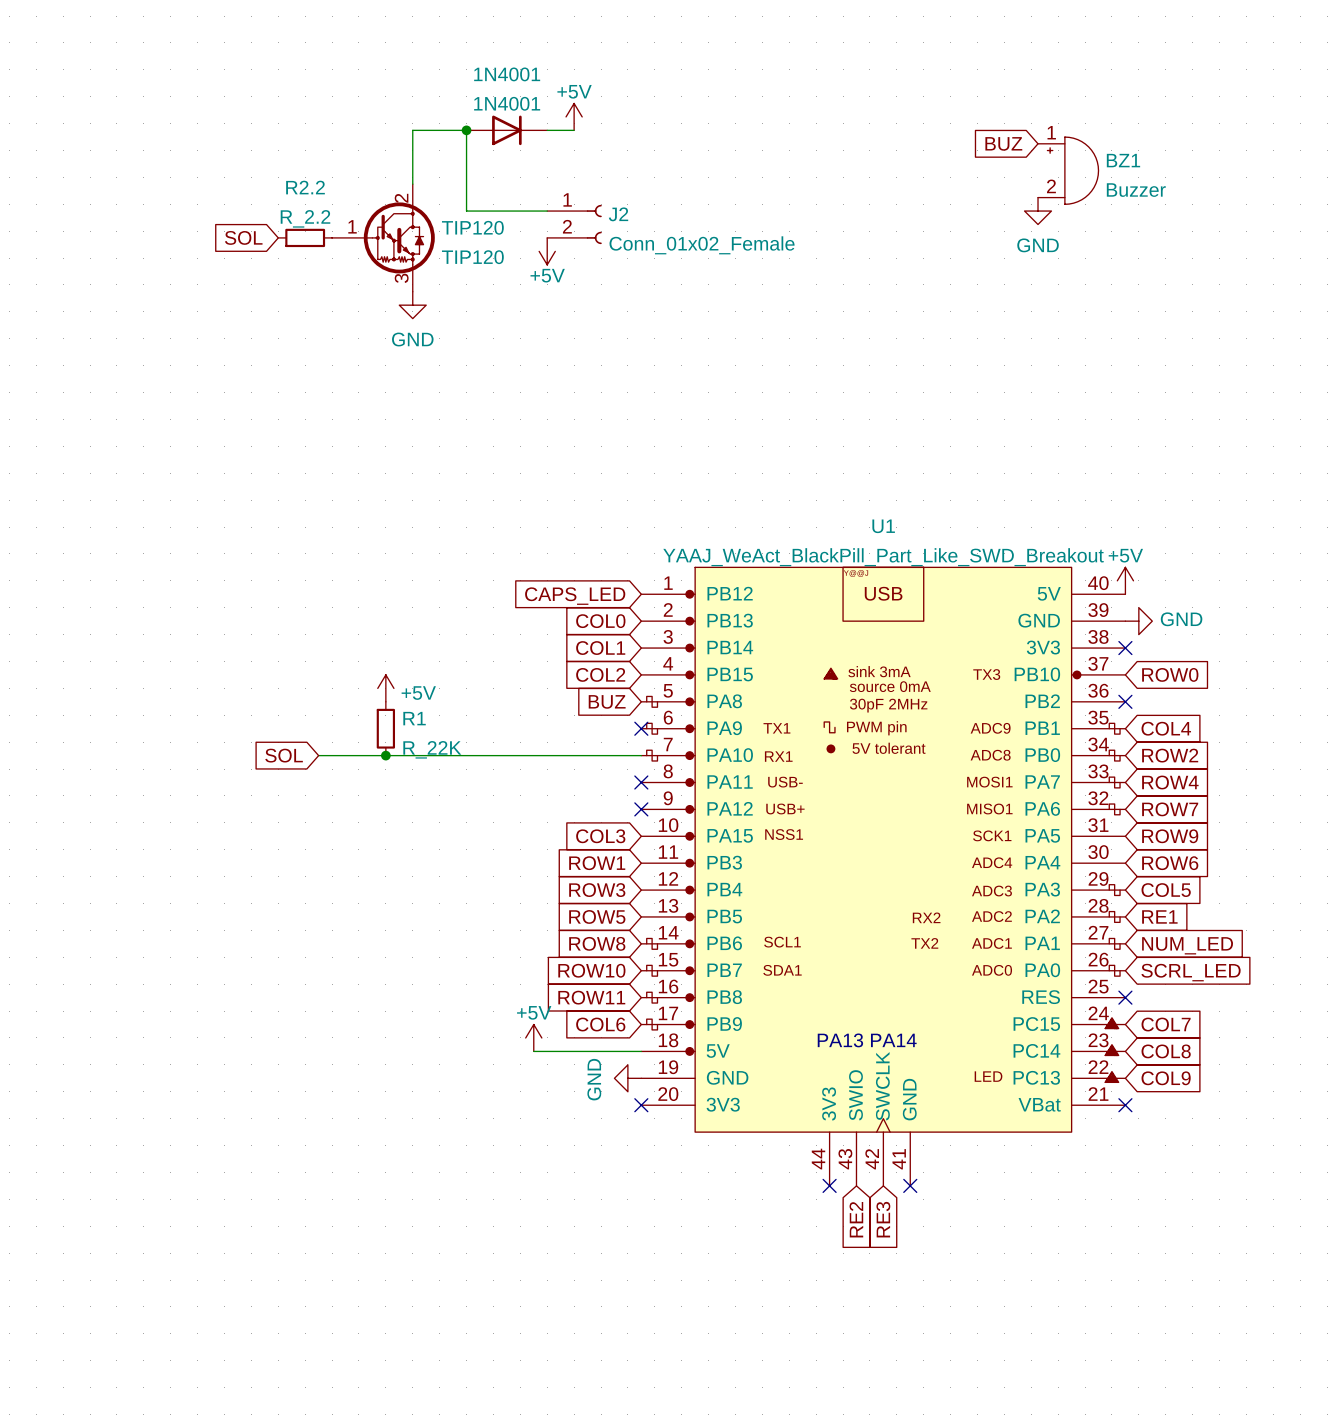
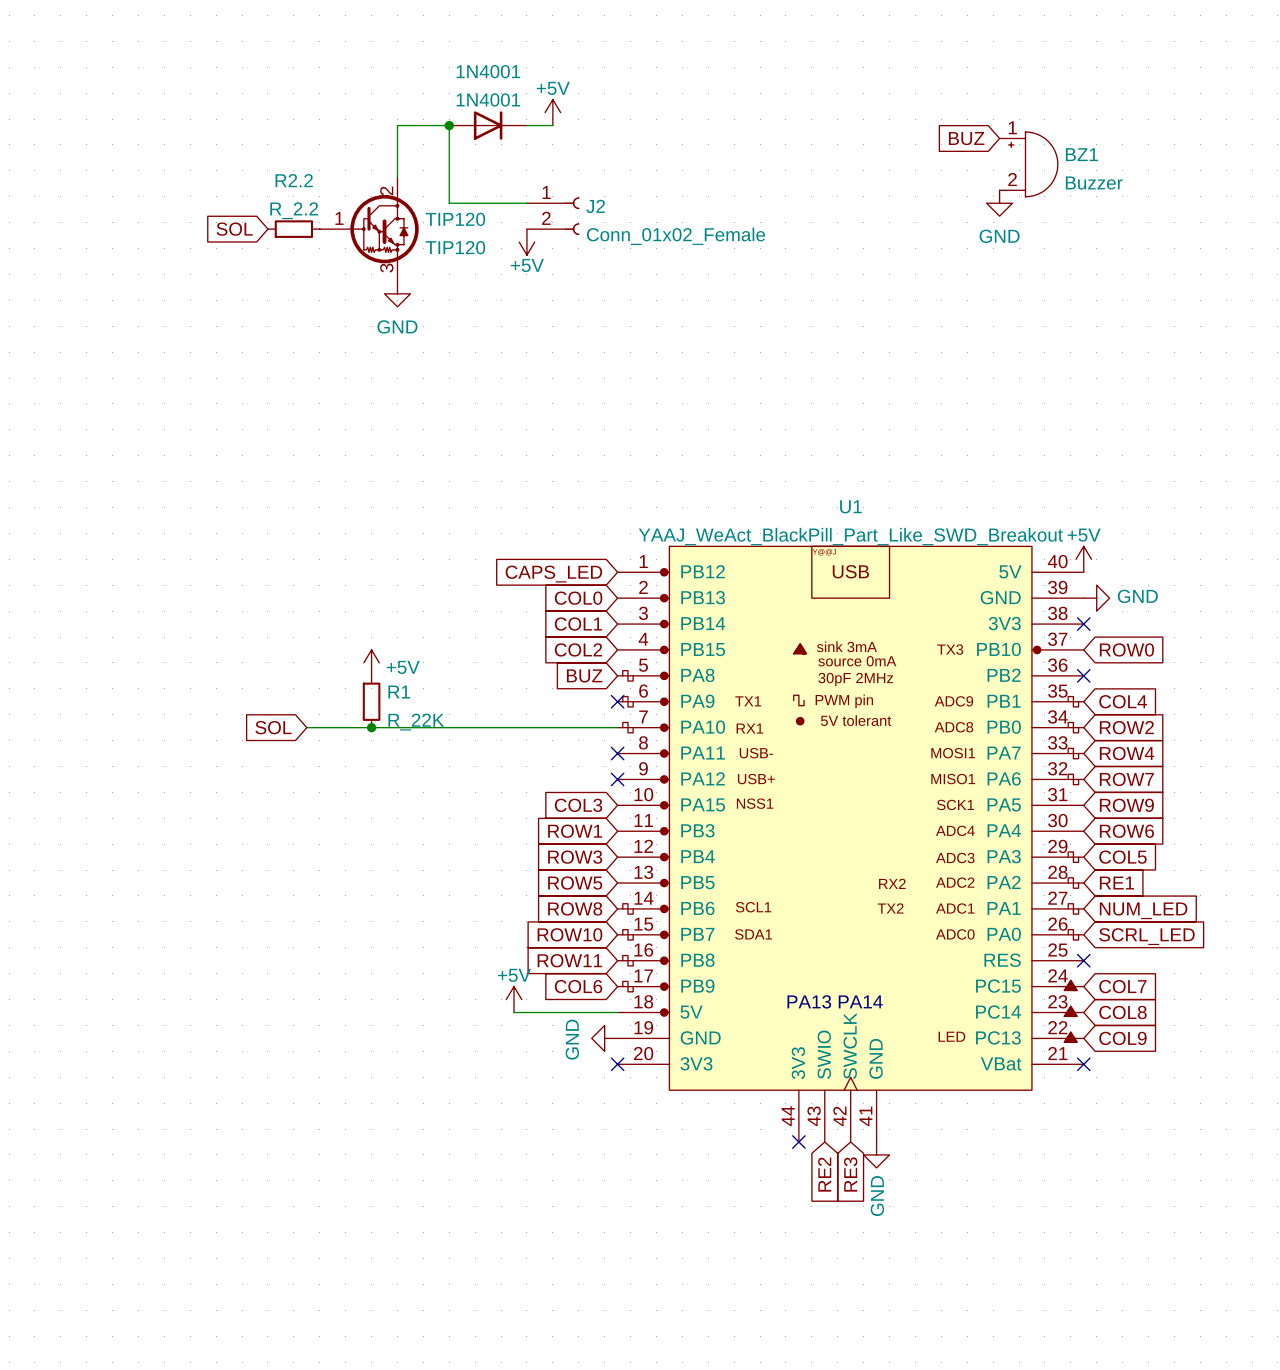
no-connect mark: (910, 1185) -> none
power symbol: none -> GND (876, 1154)

